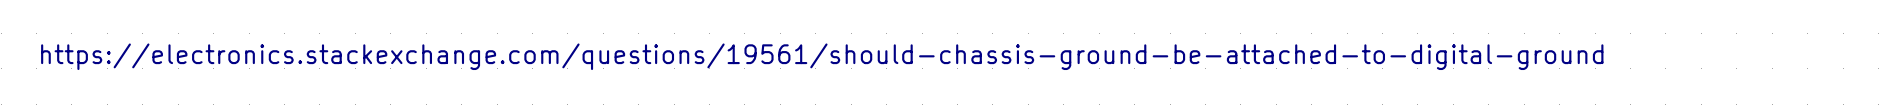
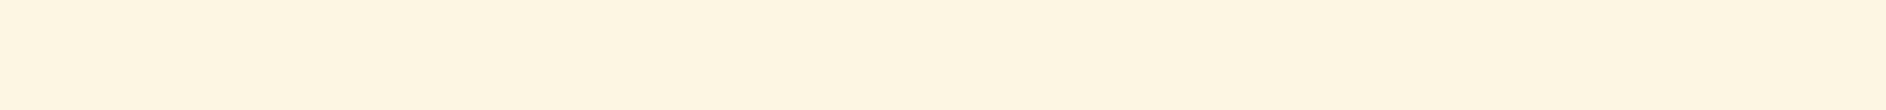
text: https://electronics.stackexchange.com/questions/19561/should-chassis-ground-be-attached-to-digital-ground (822, 56) -> none

